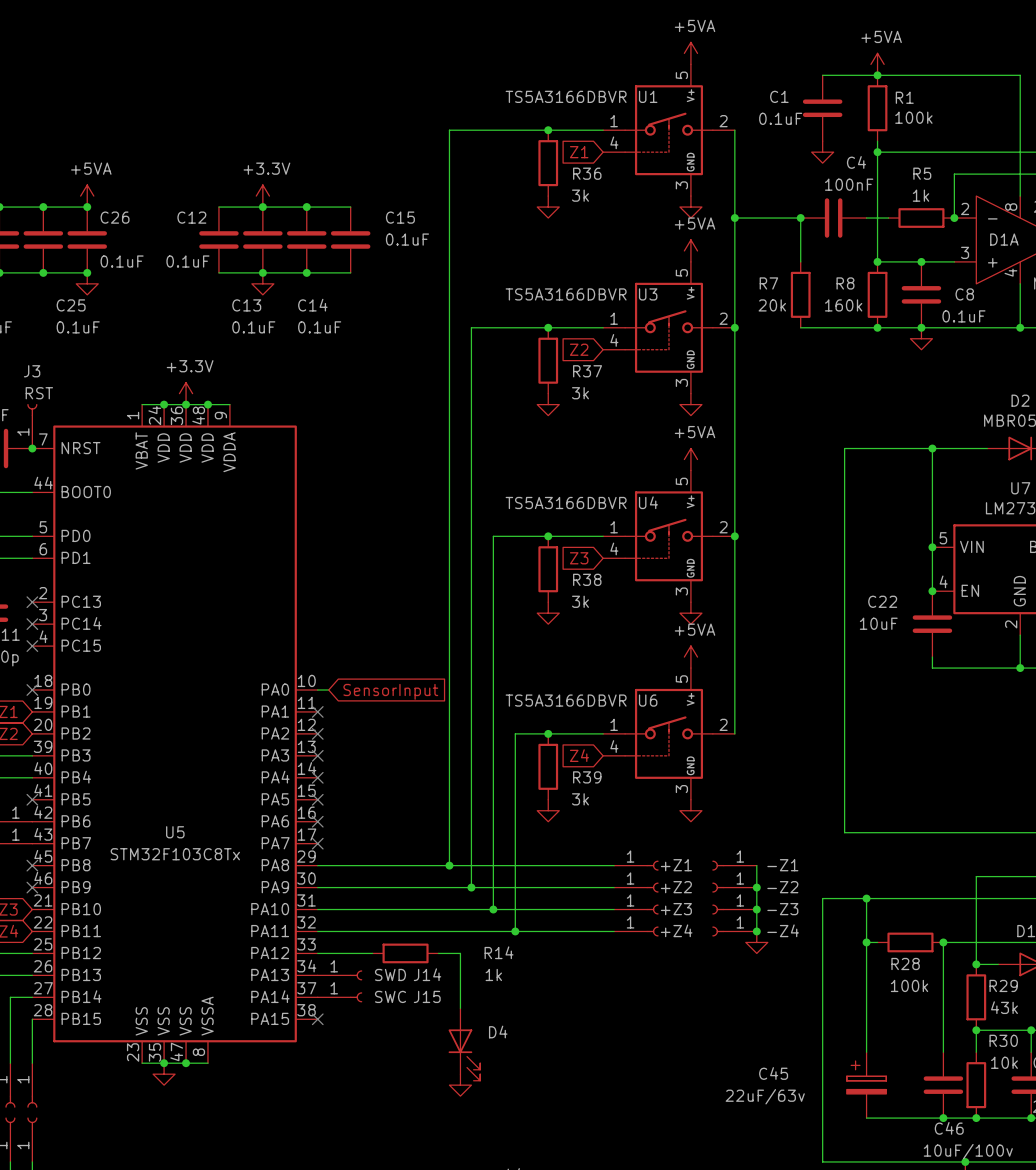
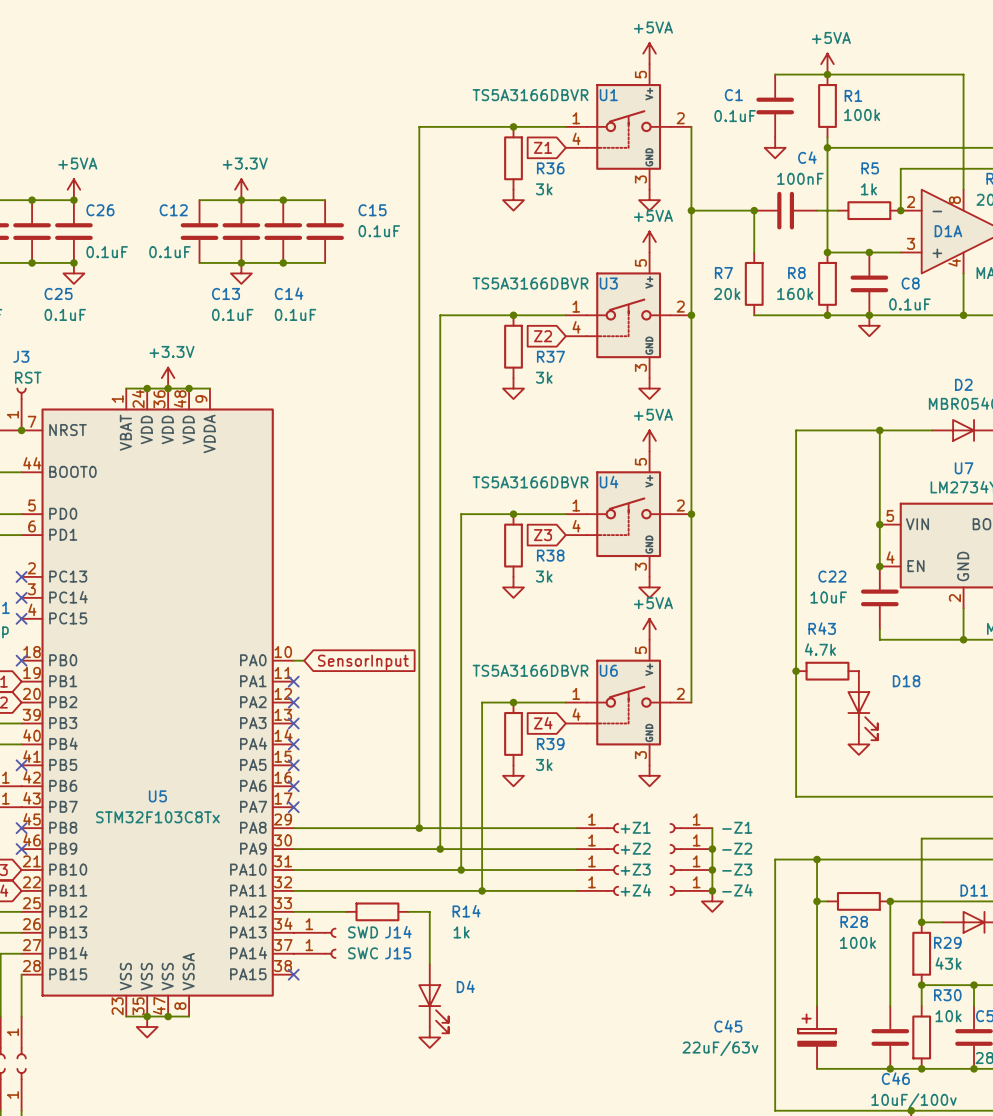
junction: none -> (796, 671)
R43: none -> 4.7k (827, 671)
D18: none -> (862, 705)
power symbol: none -> (858, 744)

